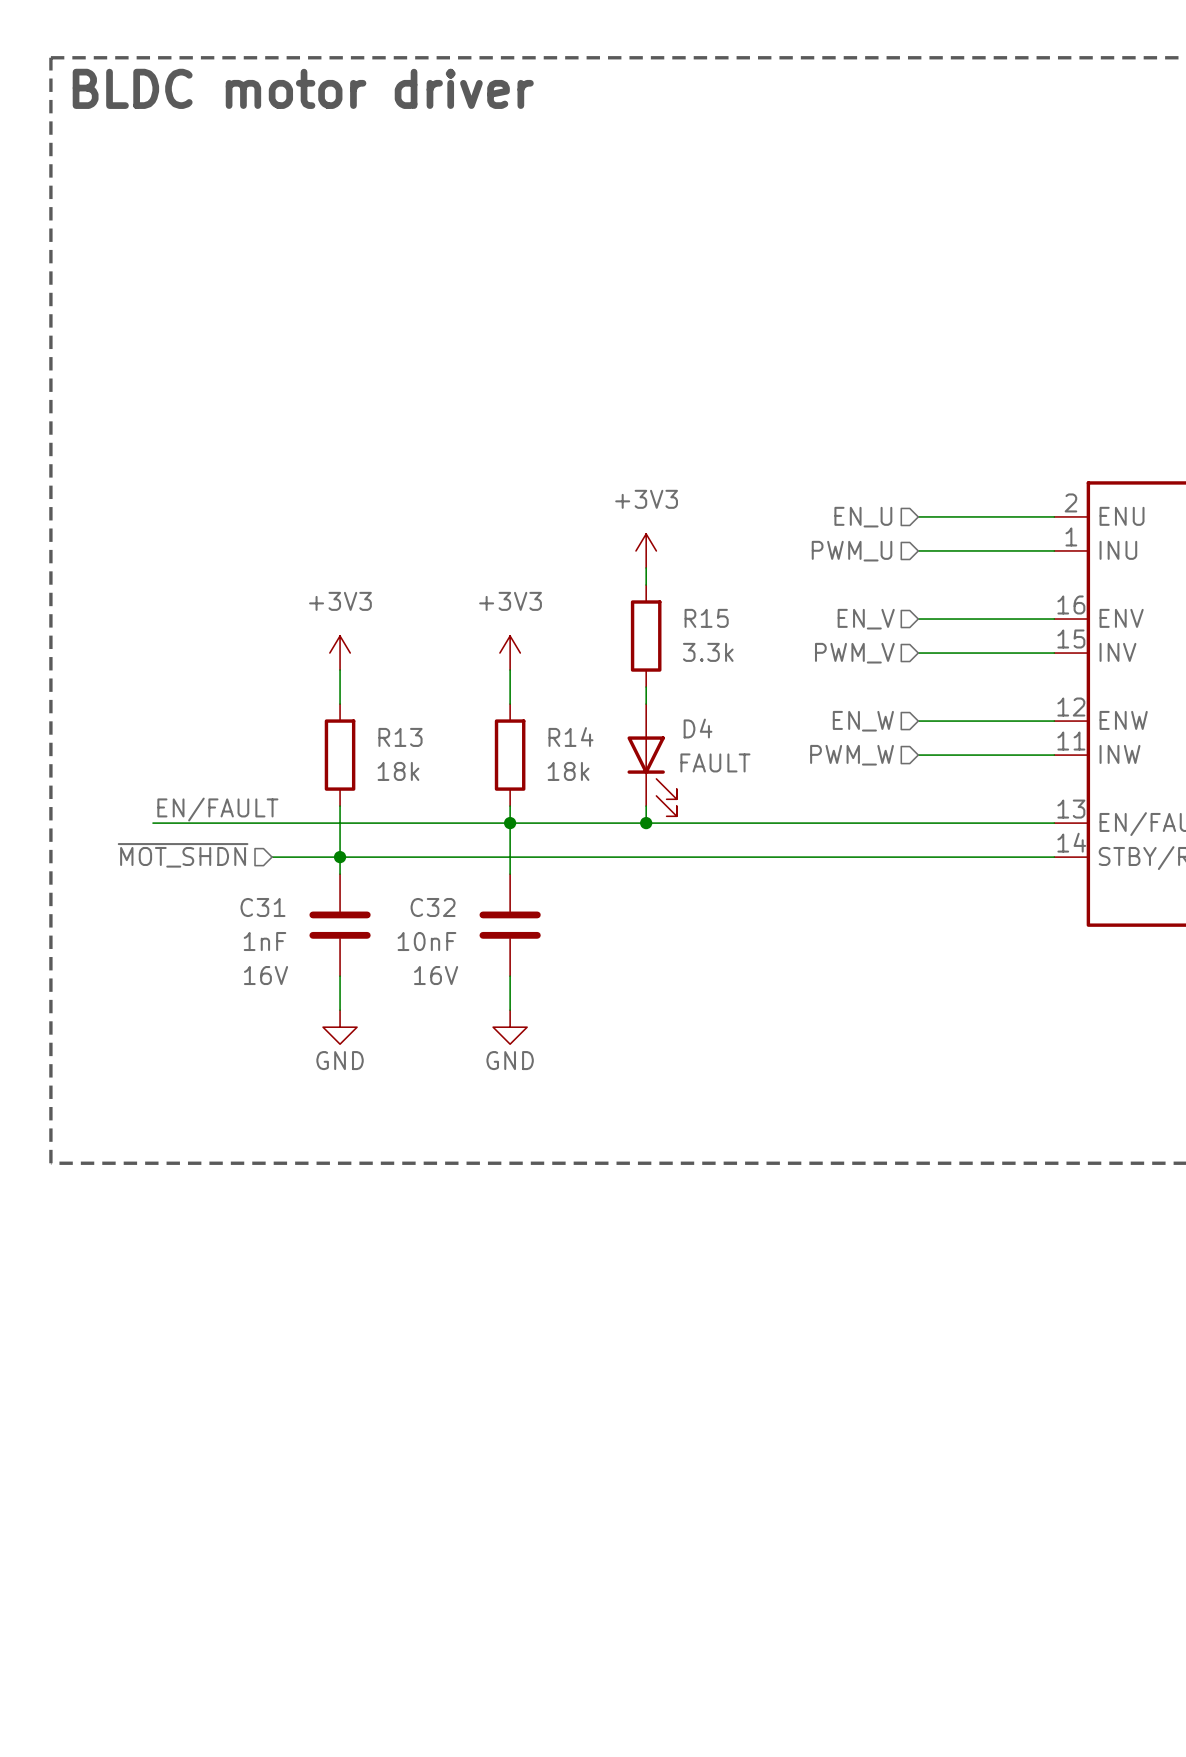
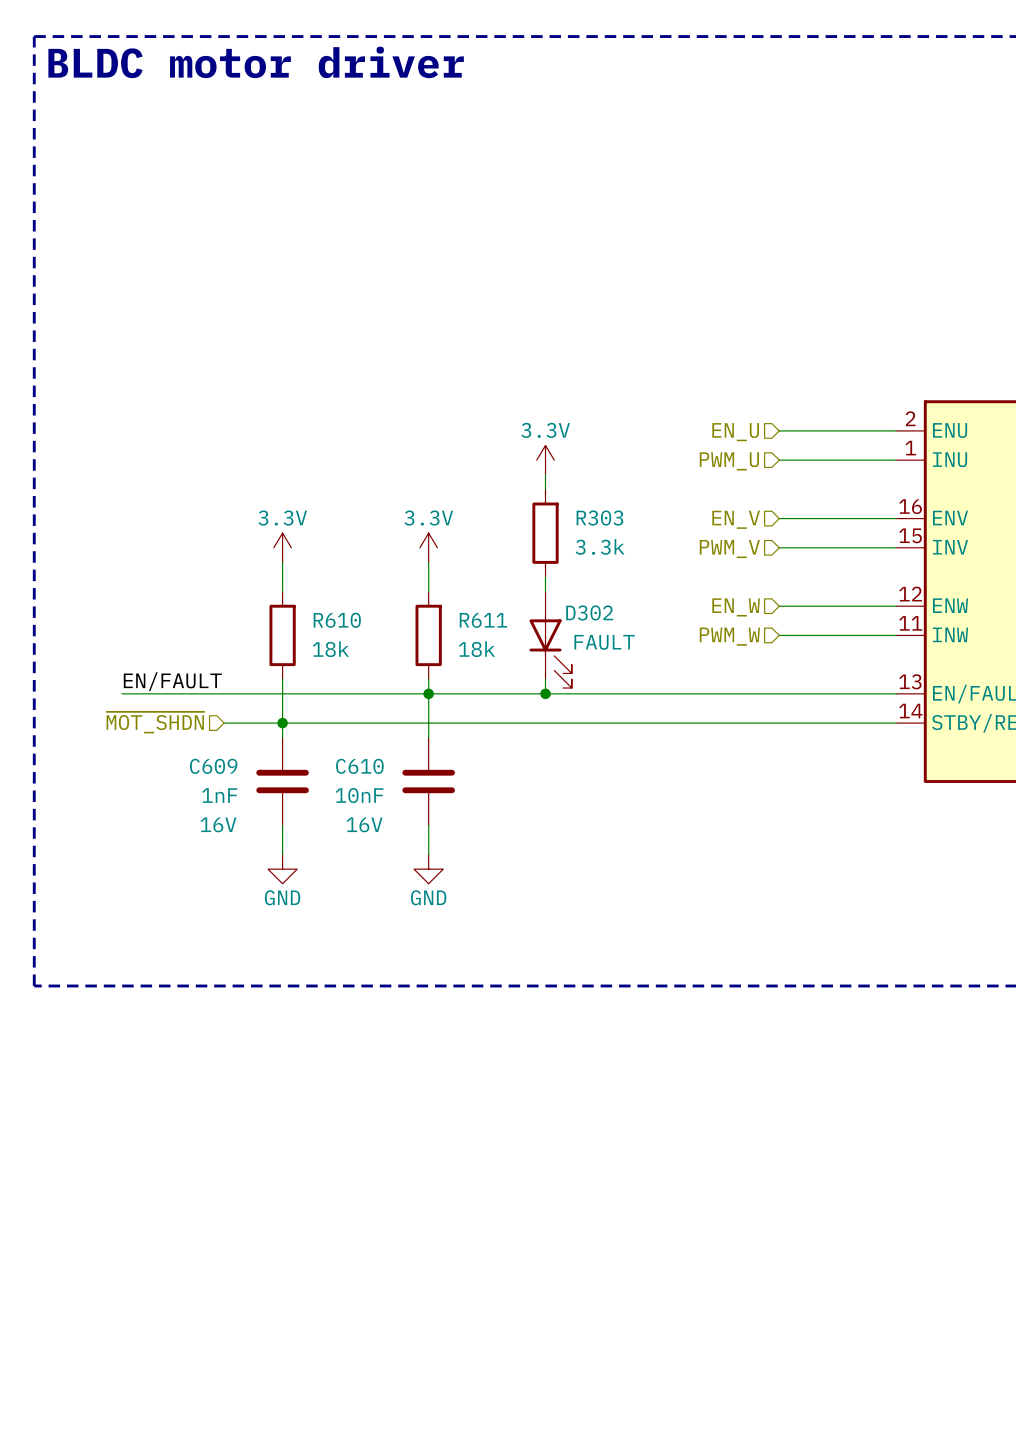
power symbol: +3V3 (646, 550) -> 3.3V (545, 460)
R15 name: R15 (706, 618) -> R303 (599, 518)
power symbol: +3V3 (340, 653) -> 3.3V (282, 547)
power symbol: +3V3 (510, 653) -> 3.3V (428, 547)
D4 name: D4 (698, 728) -> D302 (589, 612)
R13 name: R13 (400, 737) -> R610 (337, 620)
R14 name: R14 (570, 737) -> R611 (483, 620)
C31 name: C31 (262, 907) -> C609 (213, 766)
C32 name: C32 (433, 907) -> C610 (359, 766)

